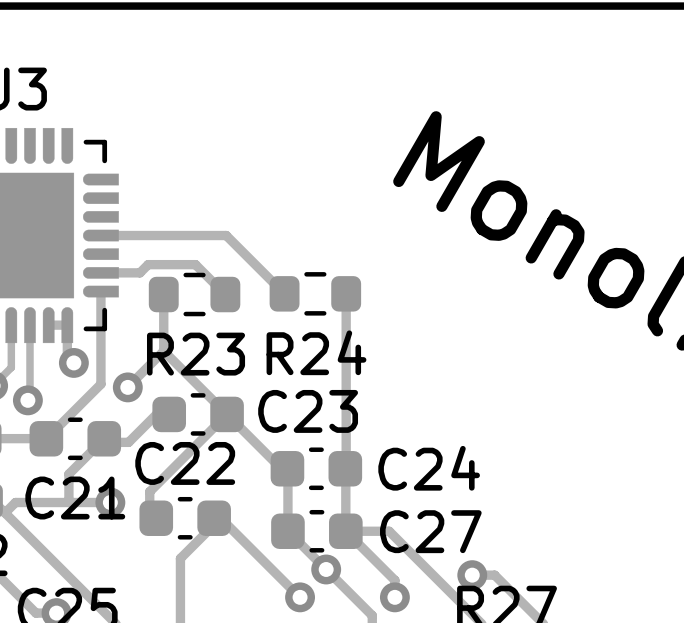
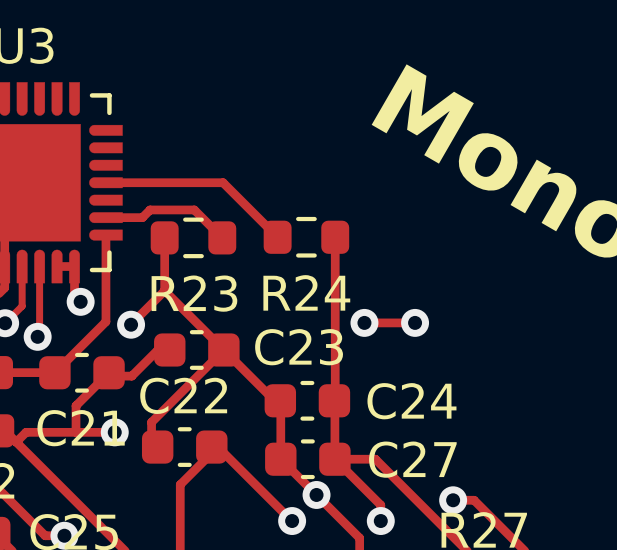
track: none -> (364, 322) (415, 322)
via: none -> (364, 322)
via: none -> (415, 322)

